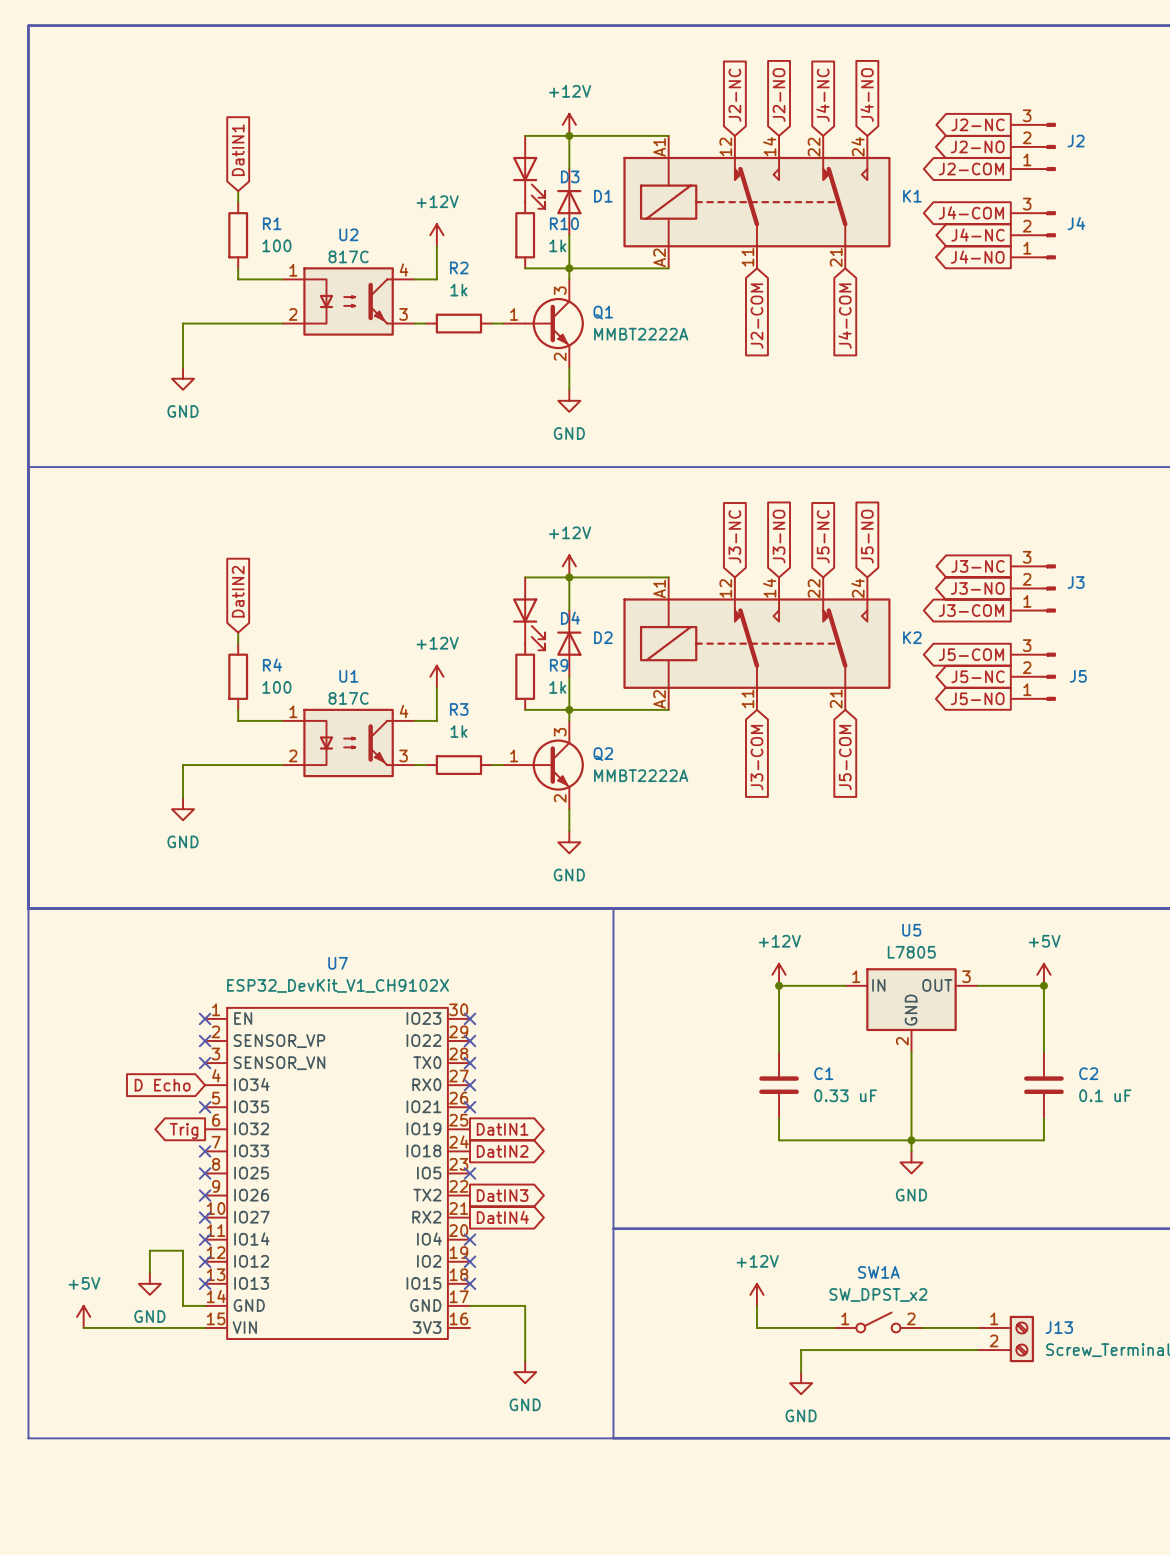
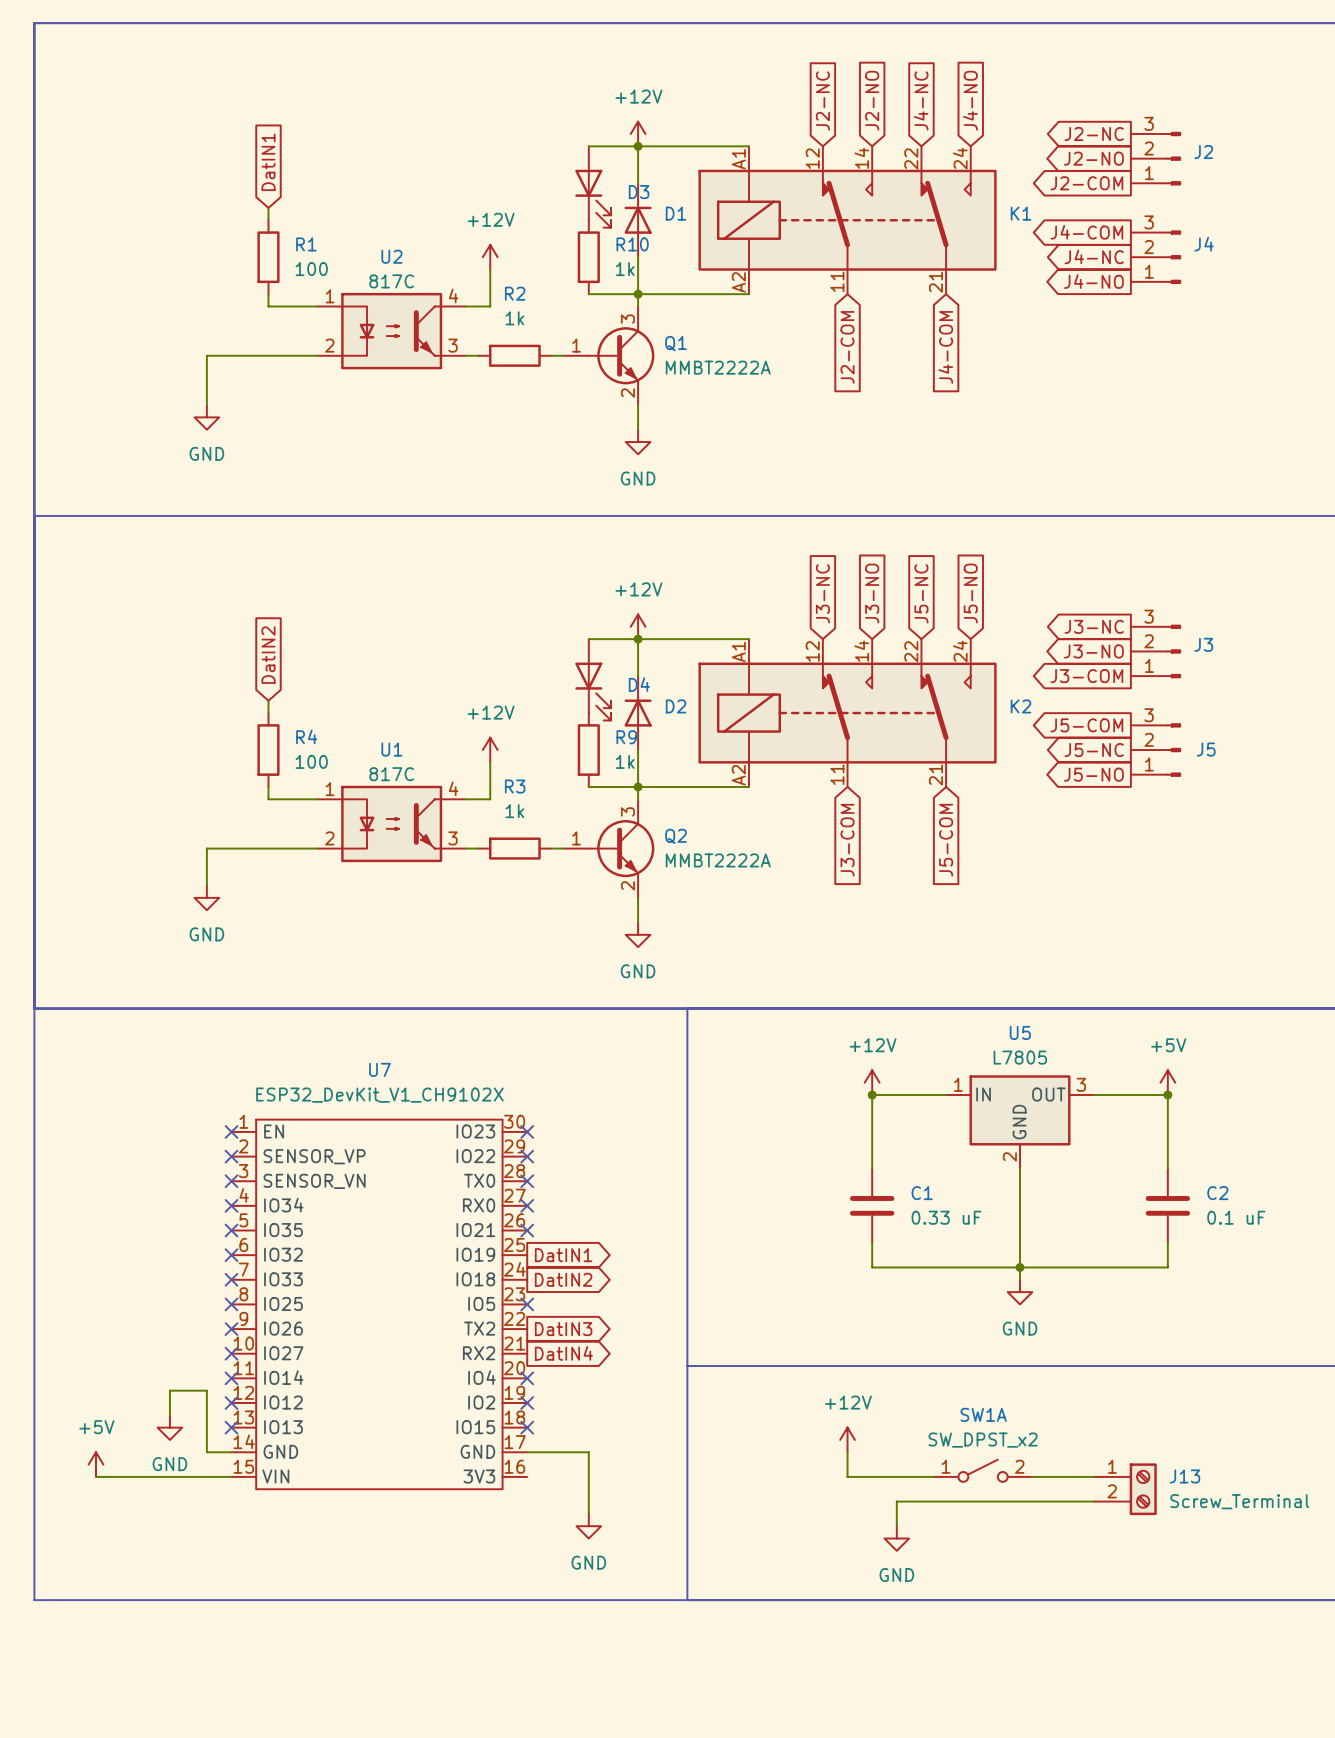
global label: D Echo (162, 1085) -> none
no-connect mark: none -> (231, 1205)
no-connect mark: none -> (231, 1255)
global label: Trig (184, 1131) -> none

